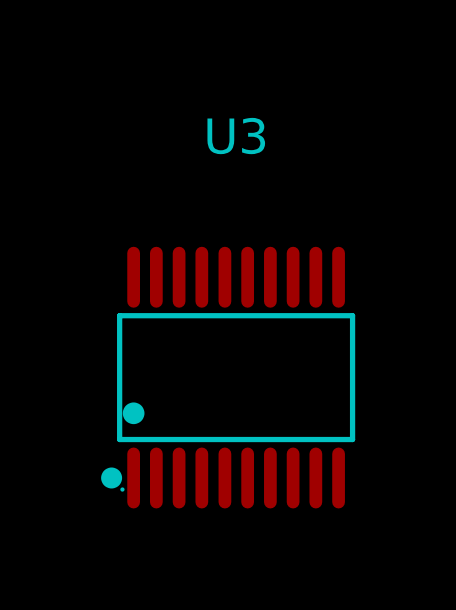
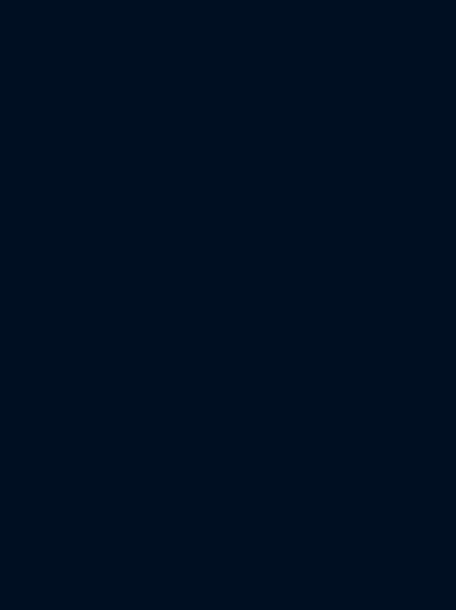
U3: (228, 377) -> none

